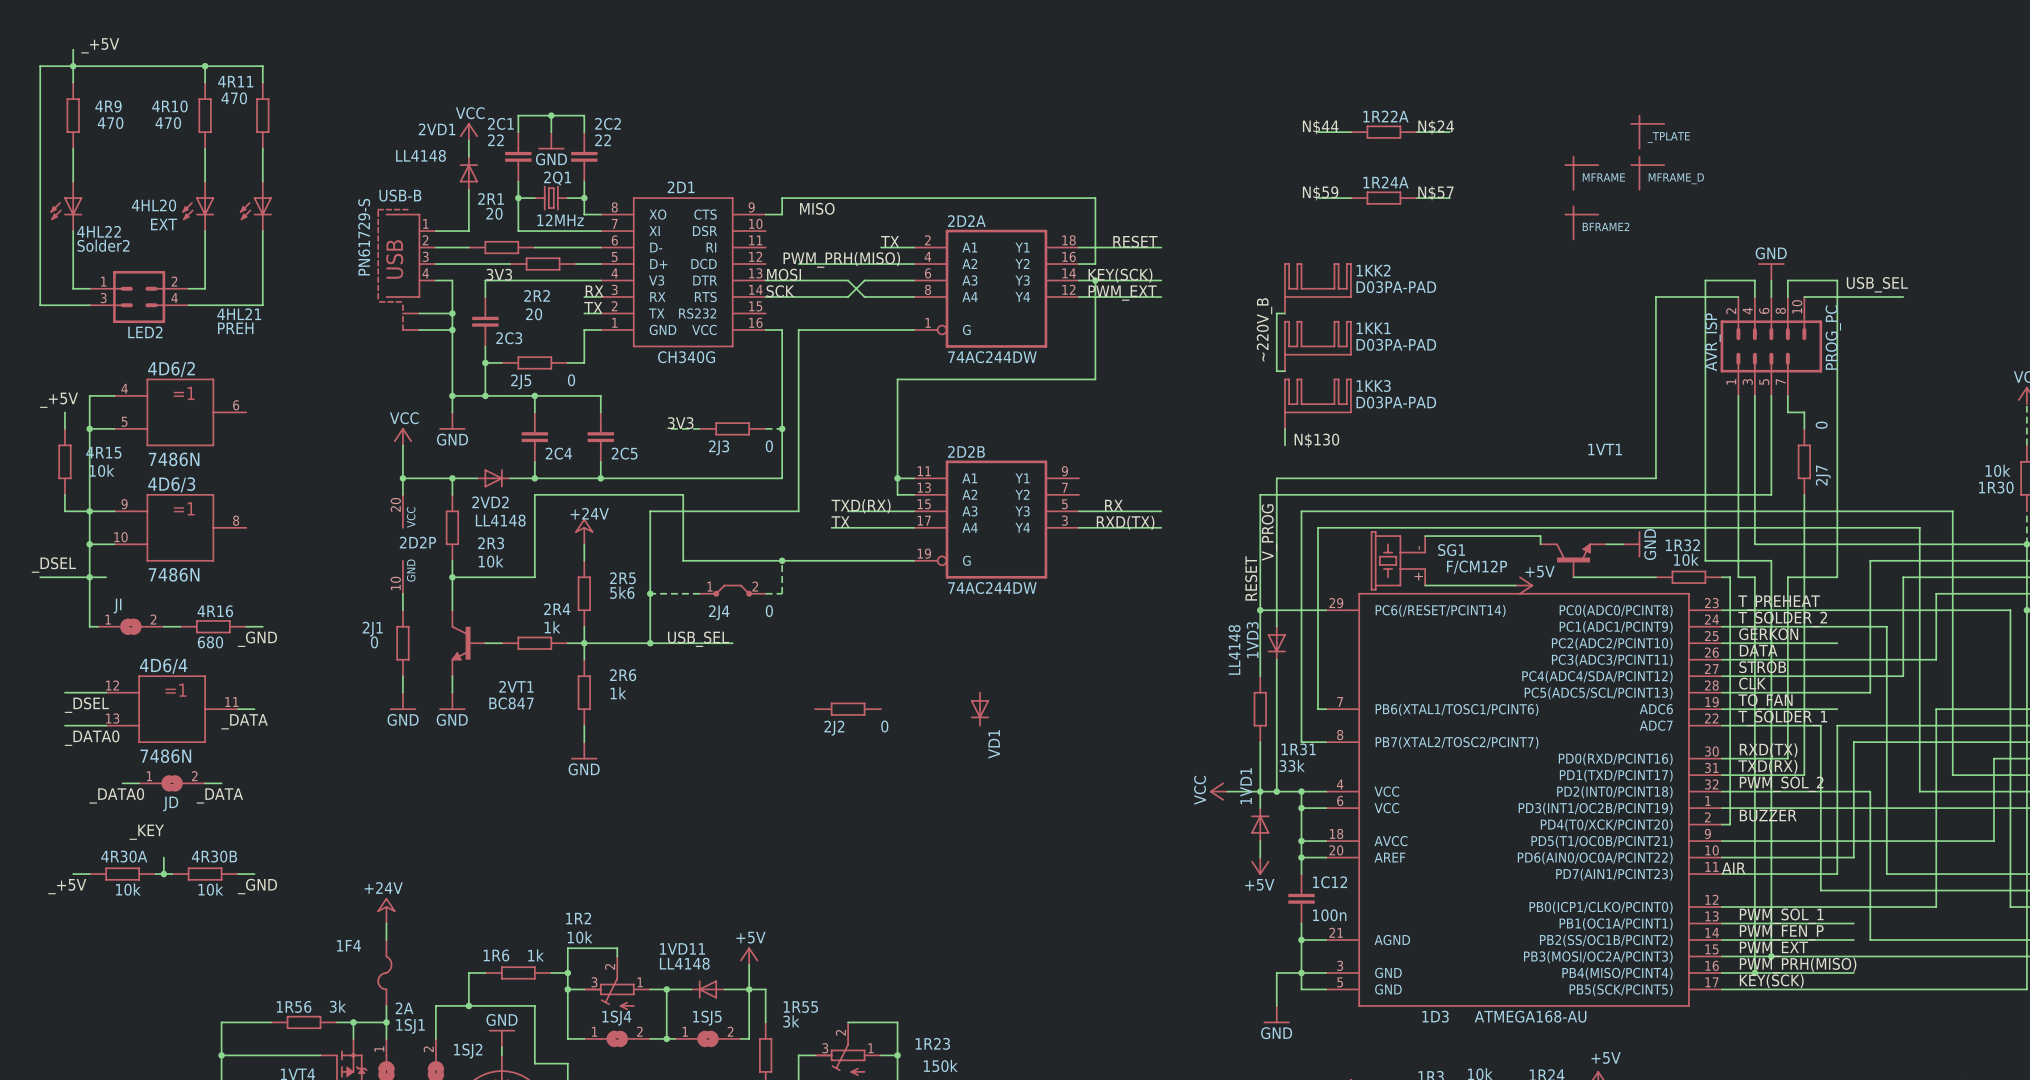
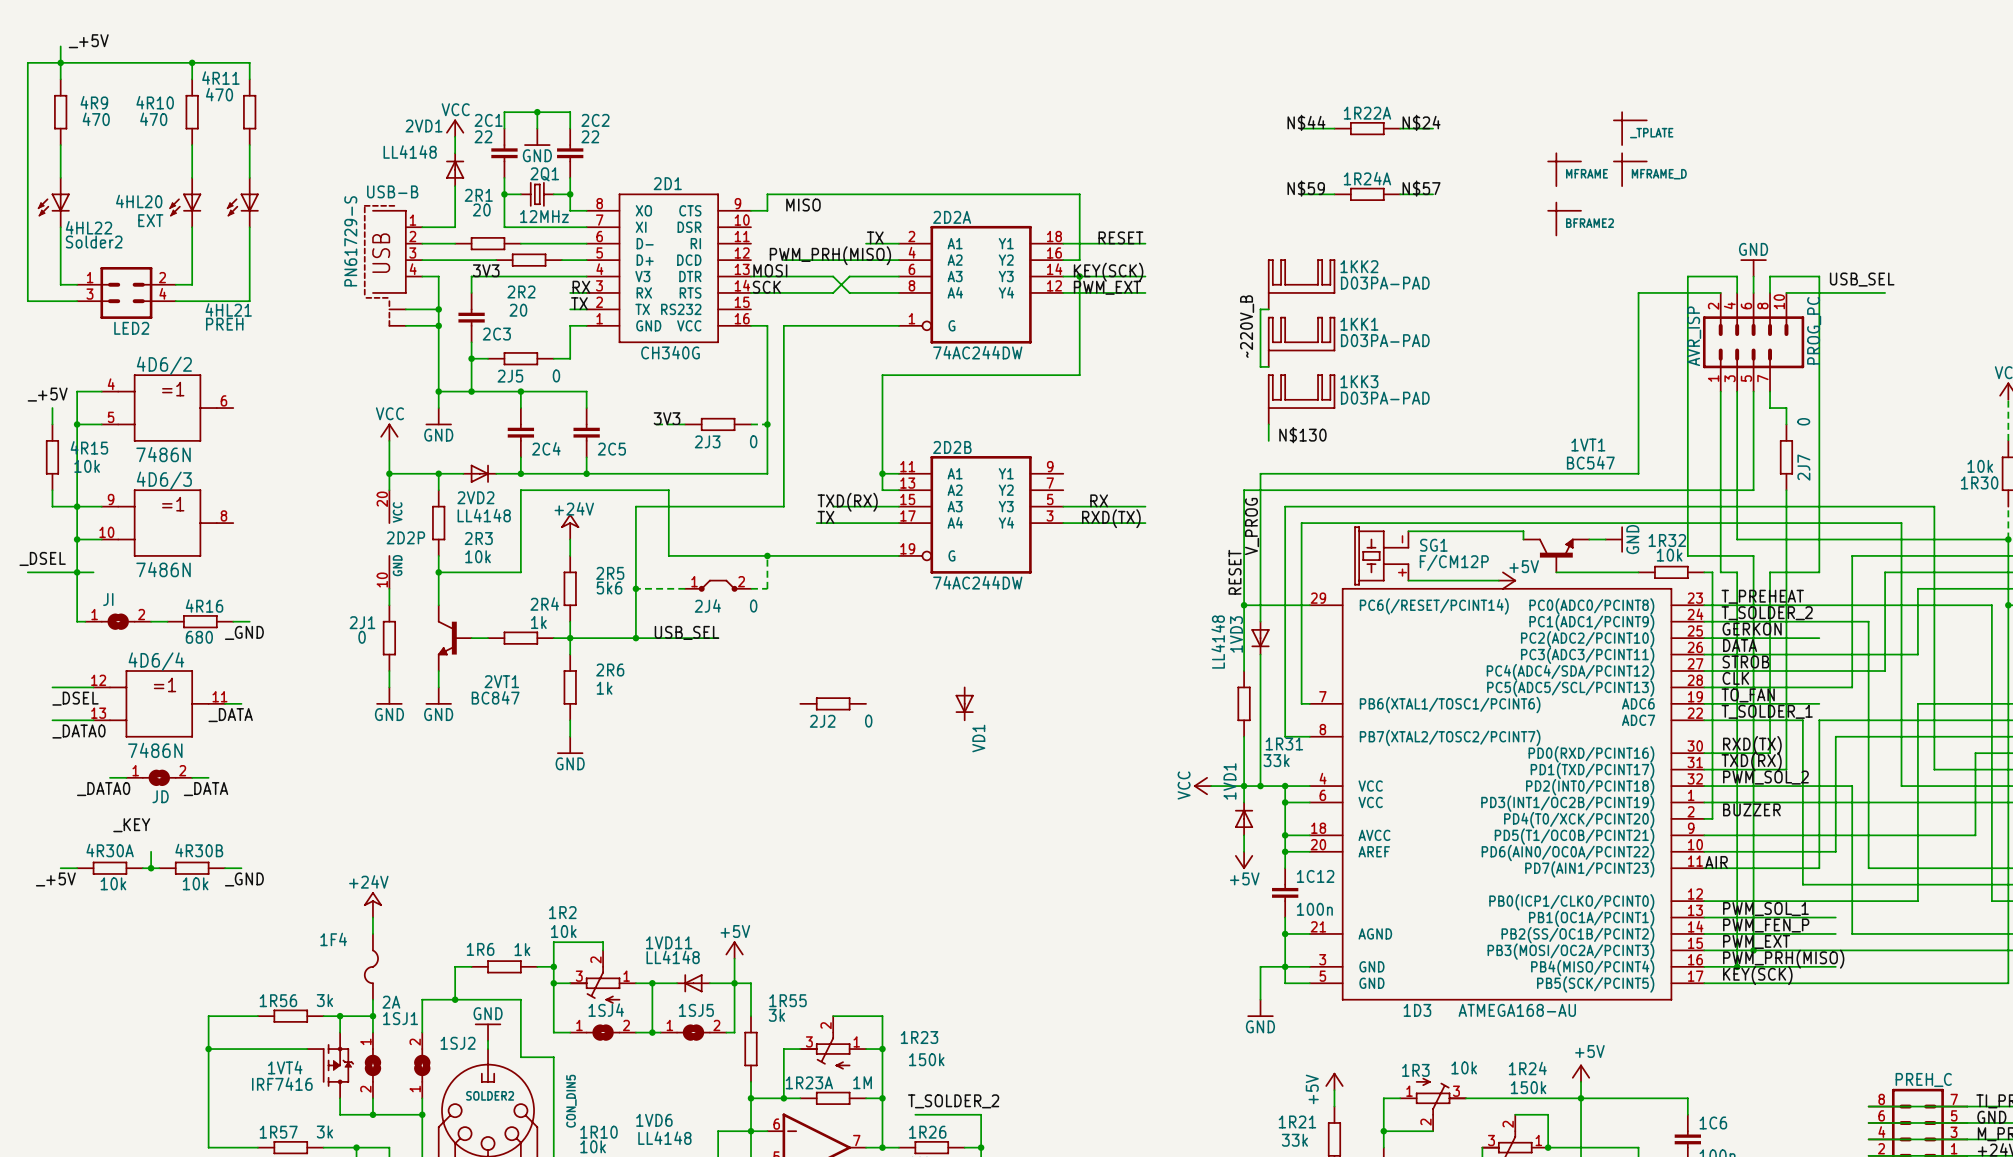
1VT1 value: none -> BC547 (1590, 462)

